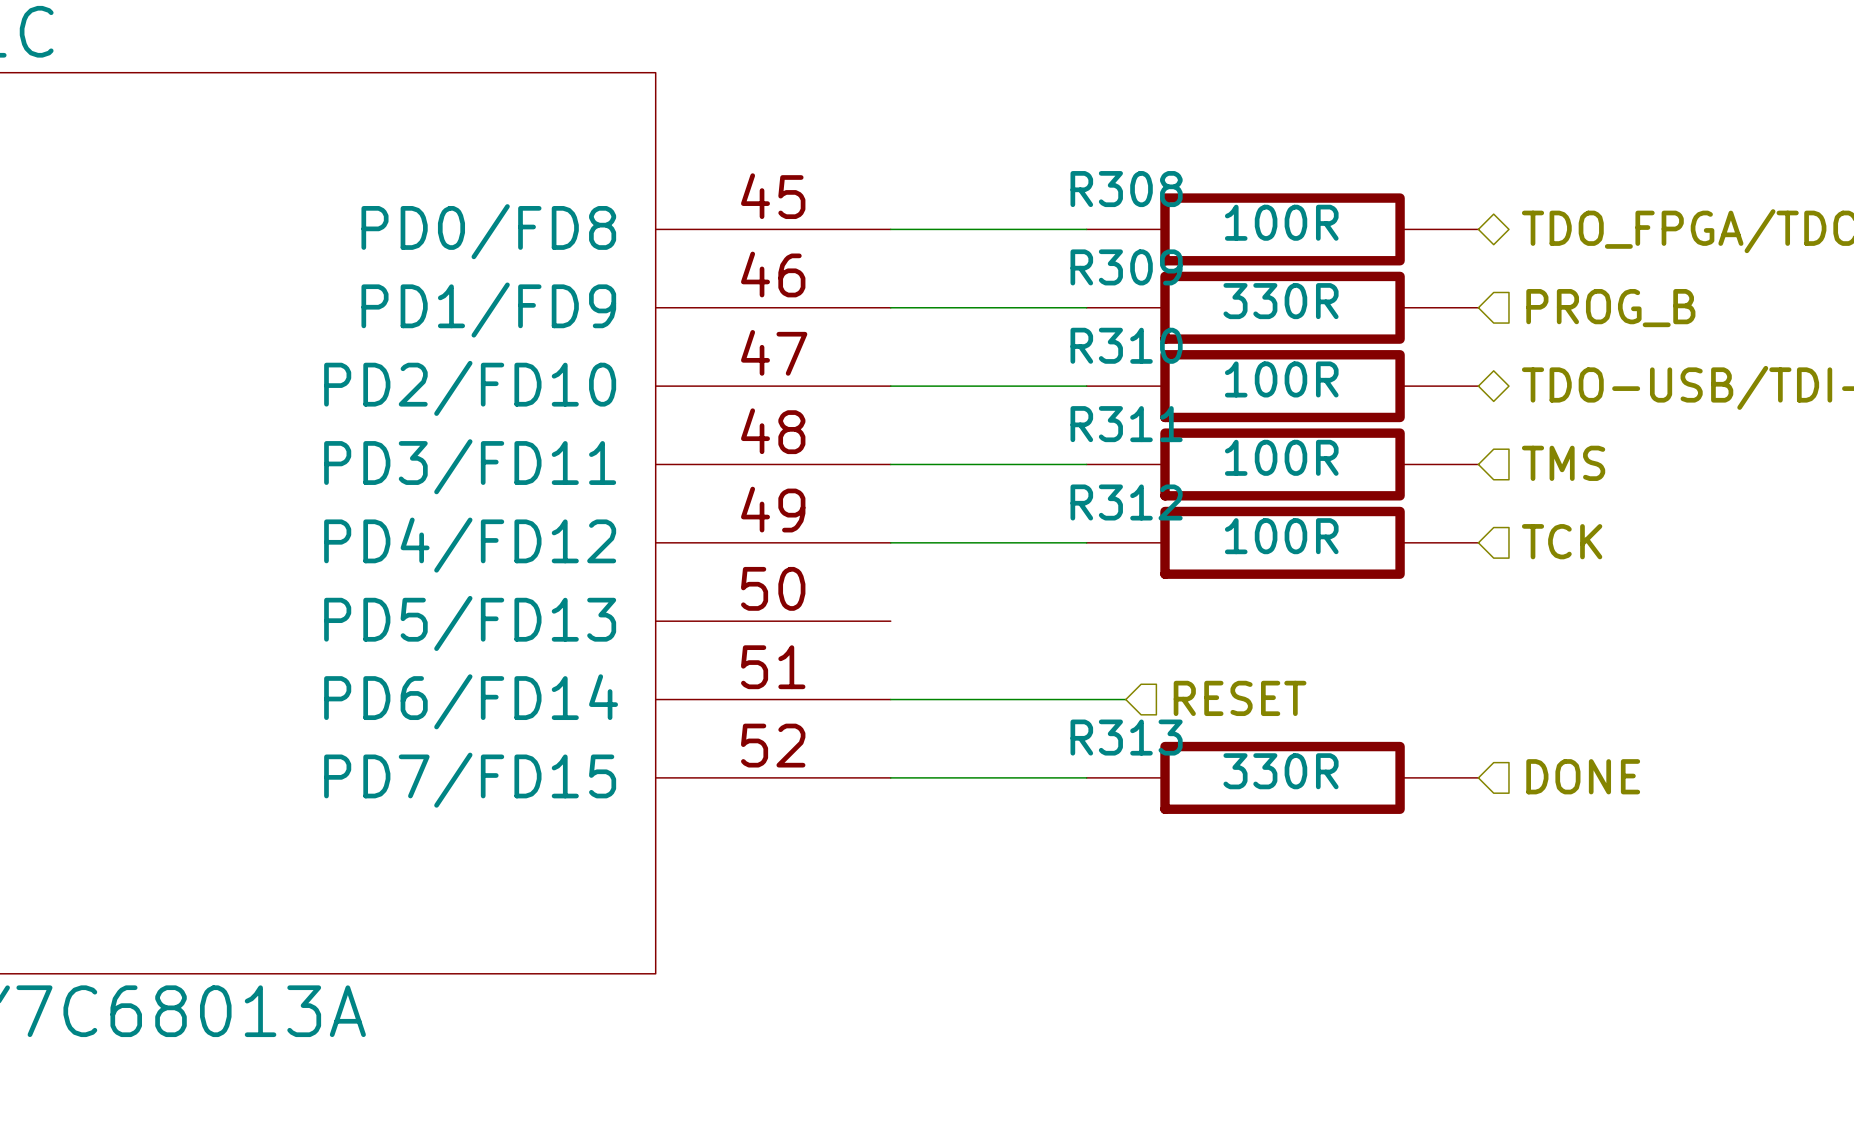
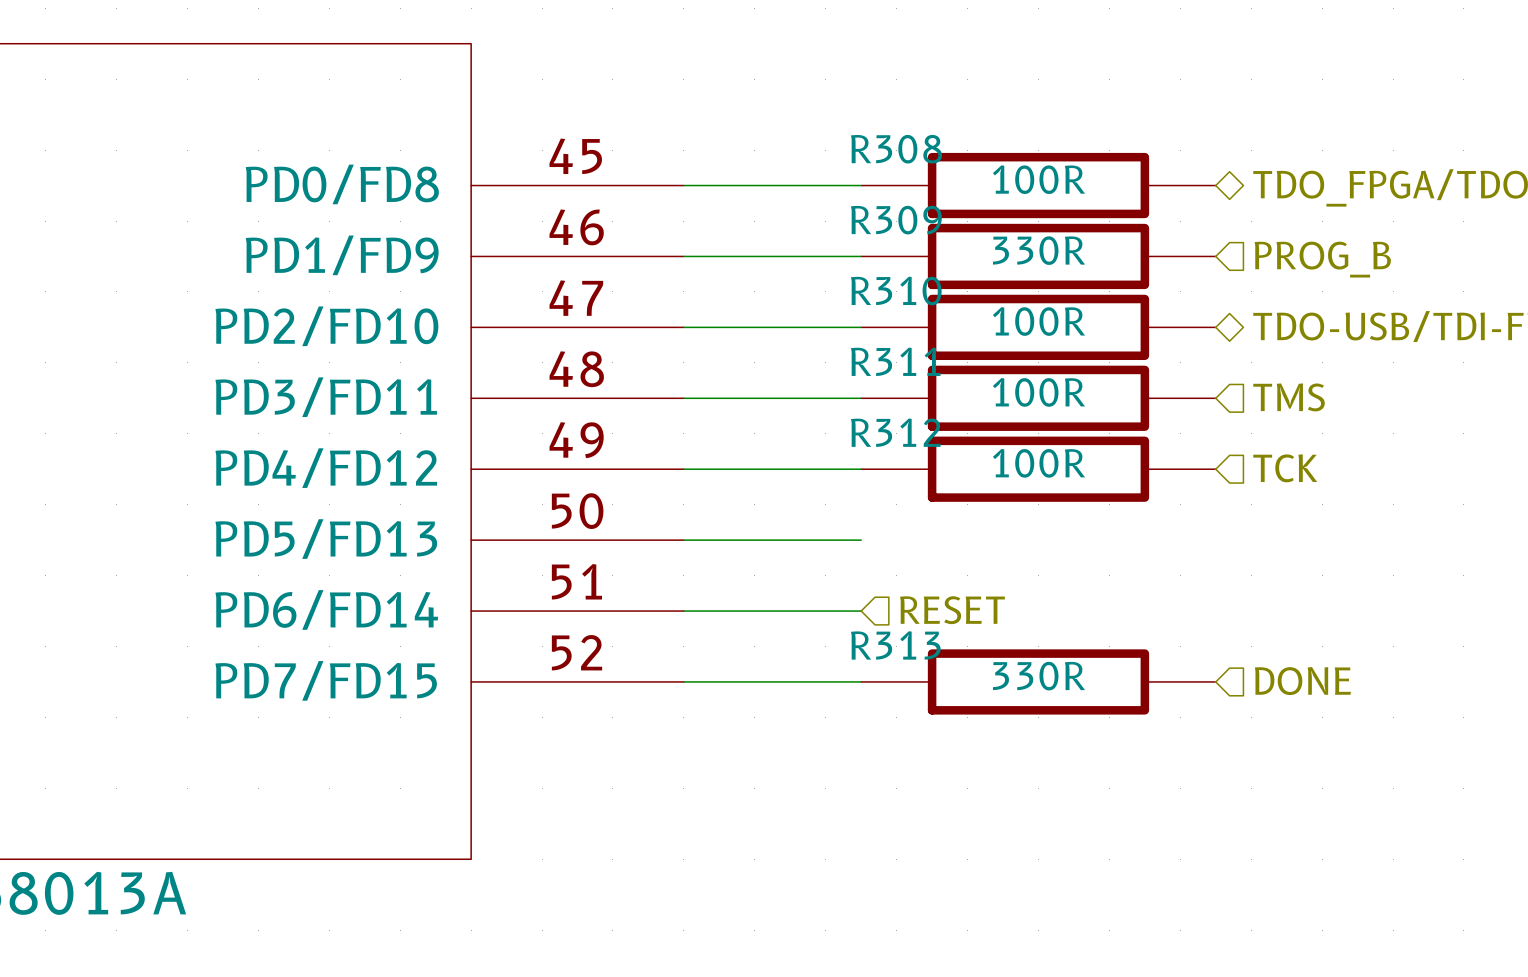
wire: none -> (683, 540) (861, 540)
hierarchical label position: RESET (1240, 698) -> RESET (952, 610)
wire: (1086, 699) (1125, 699) -> none

